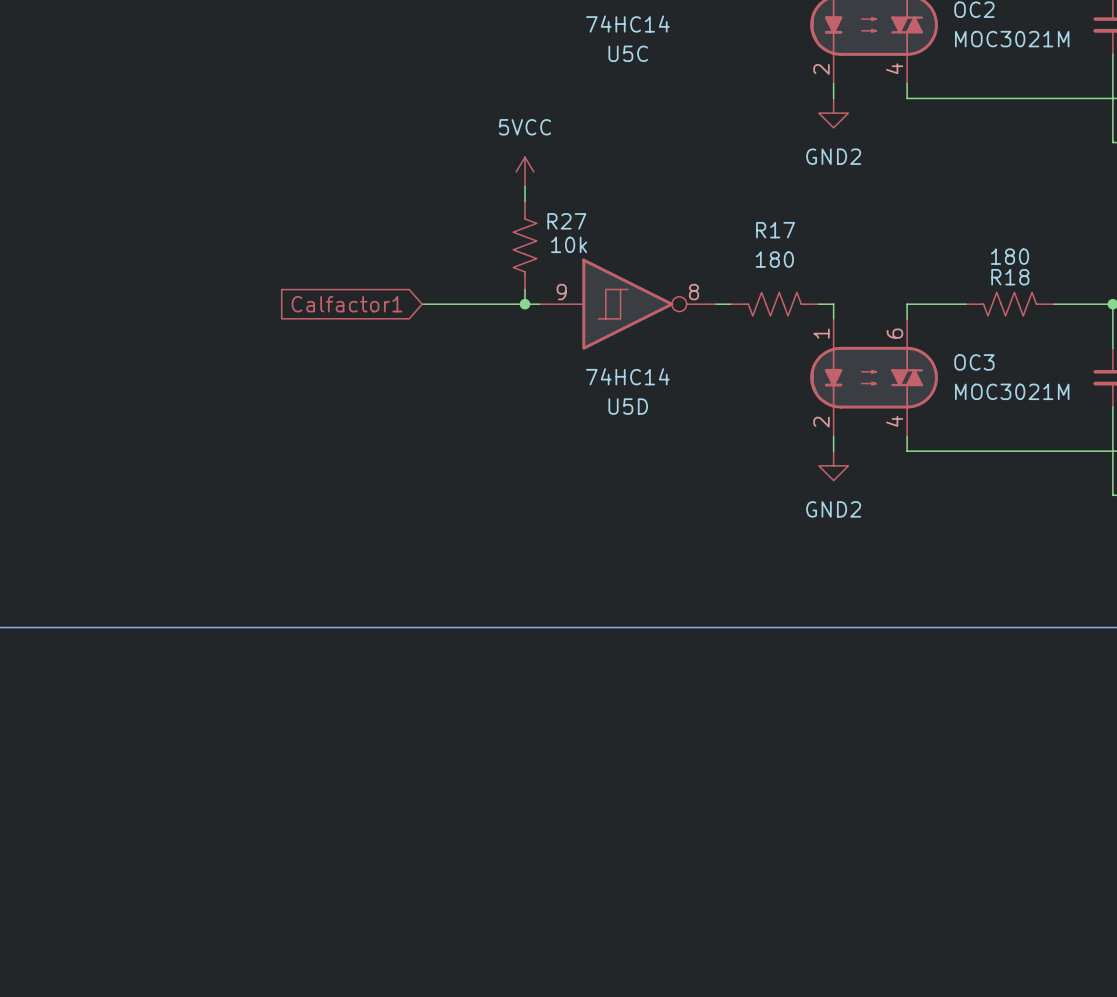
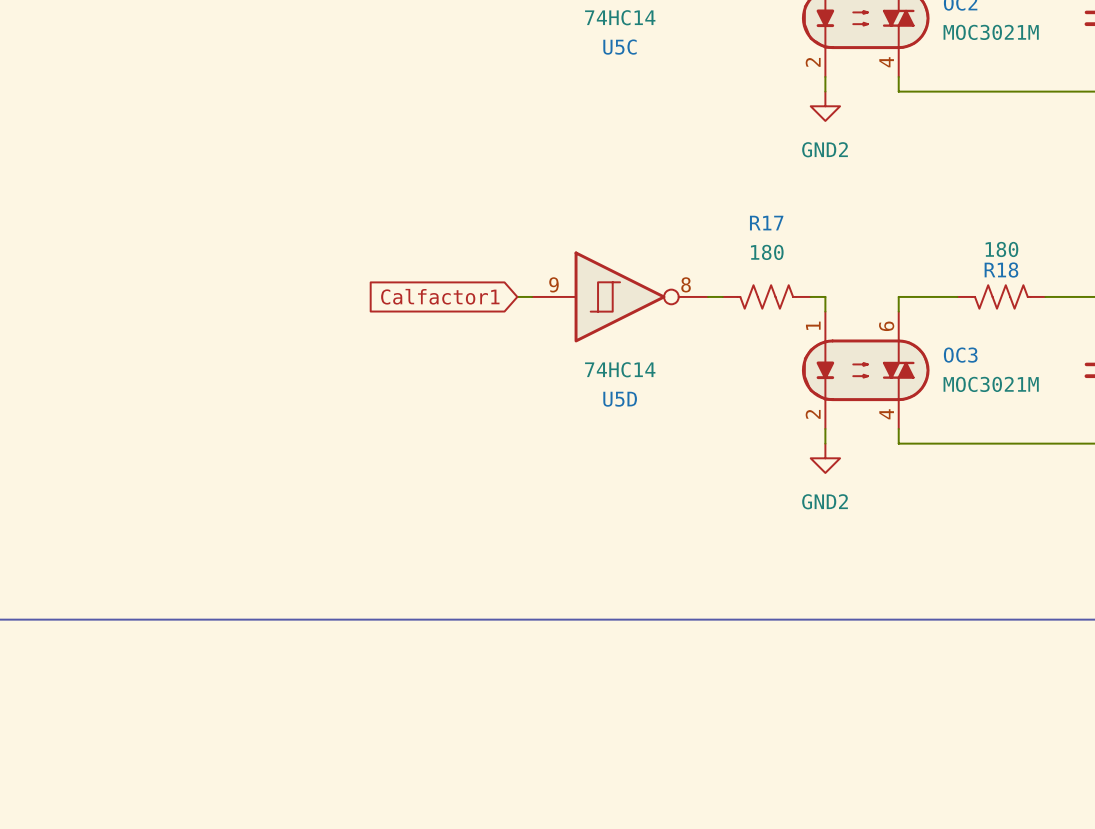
power symbol: 5VCC (524, 171) -> none
wire: (524, 186) (524, 201) -> none
R27: 10k (524, 245) -> none
wire: (524, 289) (524, 304) (422, 304) -> none
global label position: Calfactor1 (347, 304) -> Calfactor1 (440, 296)
junction: (524, 304) -> none

